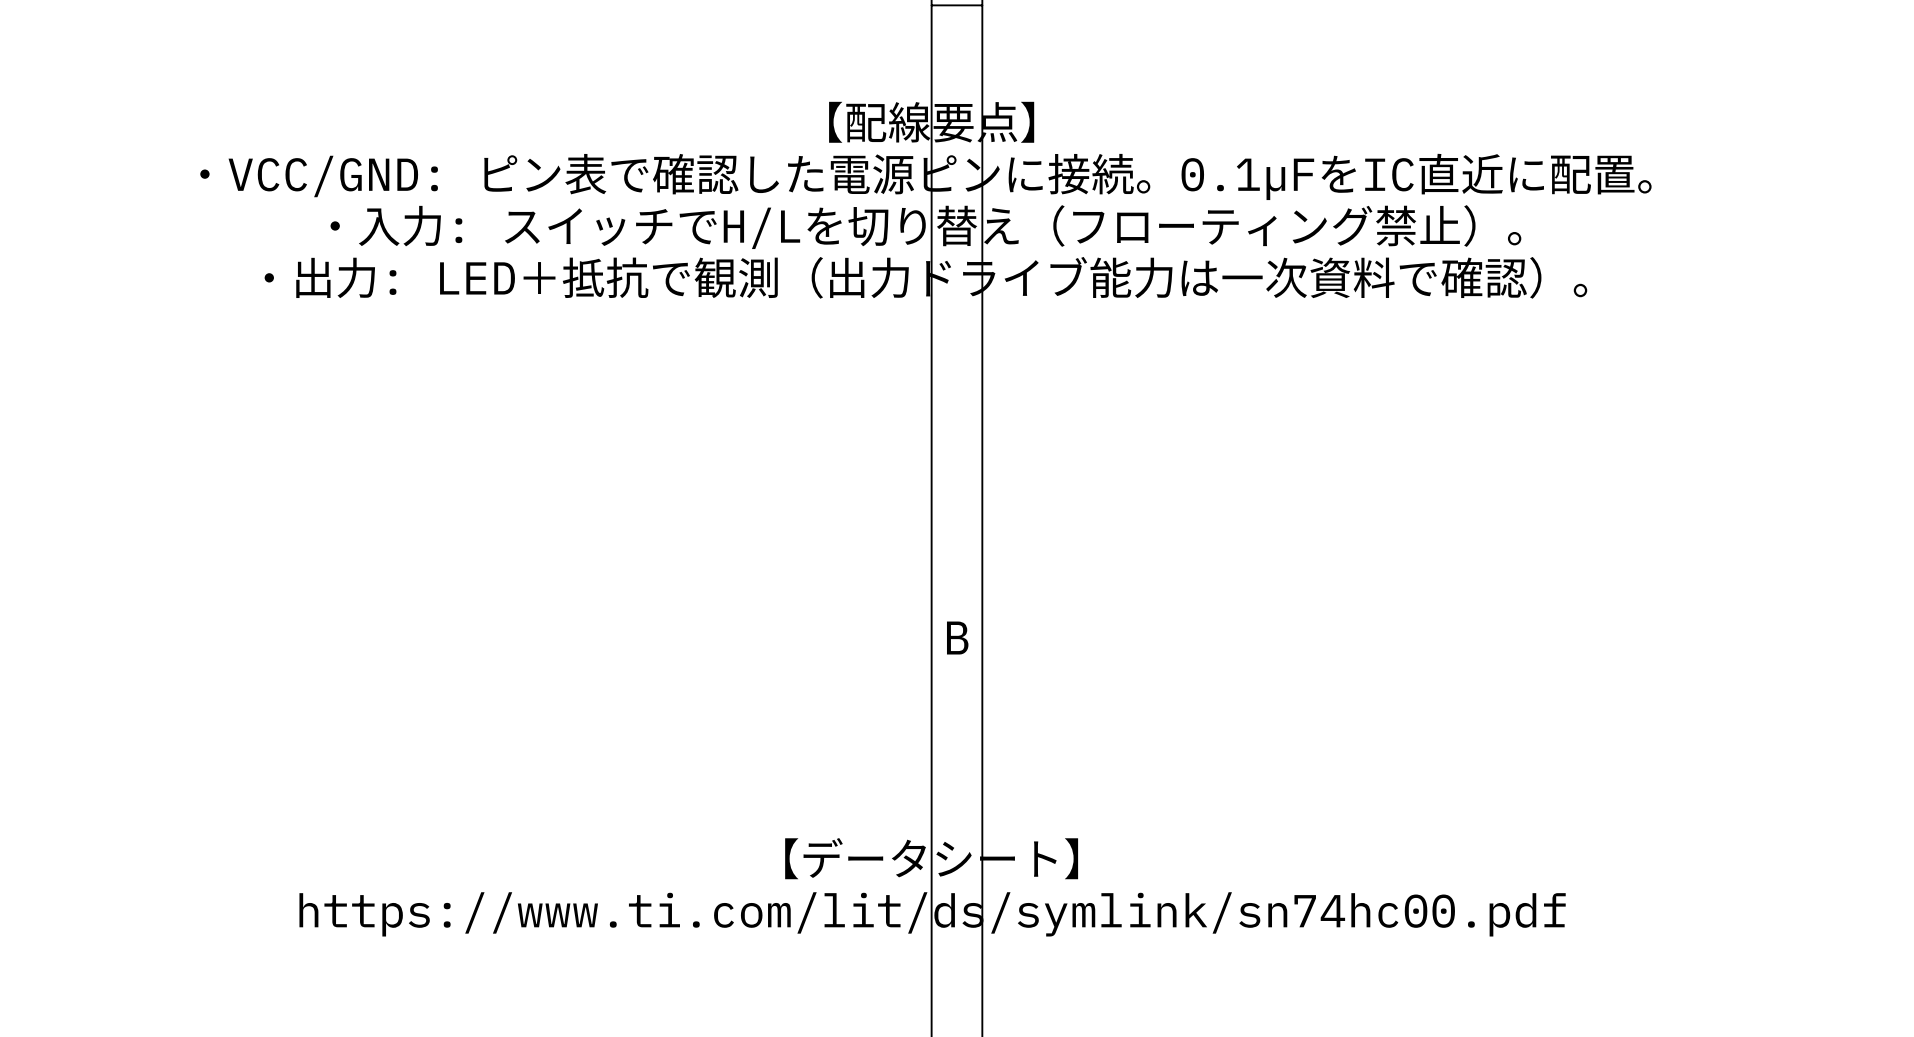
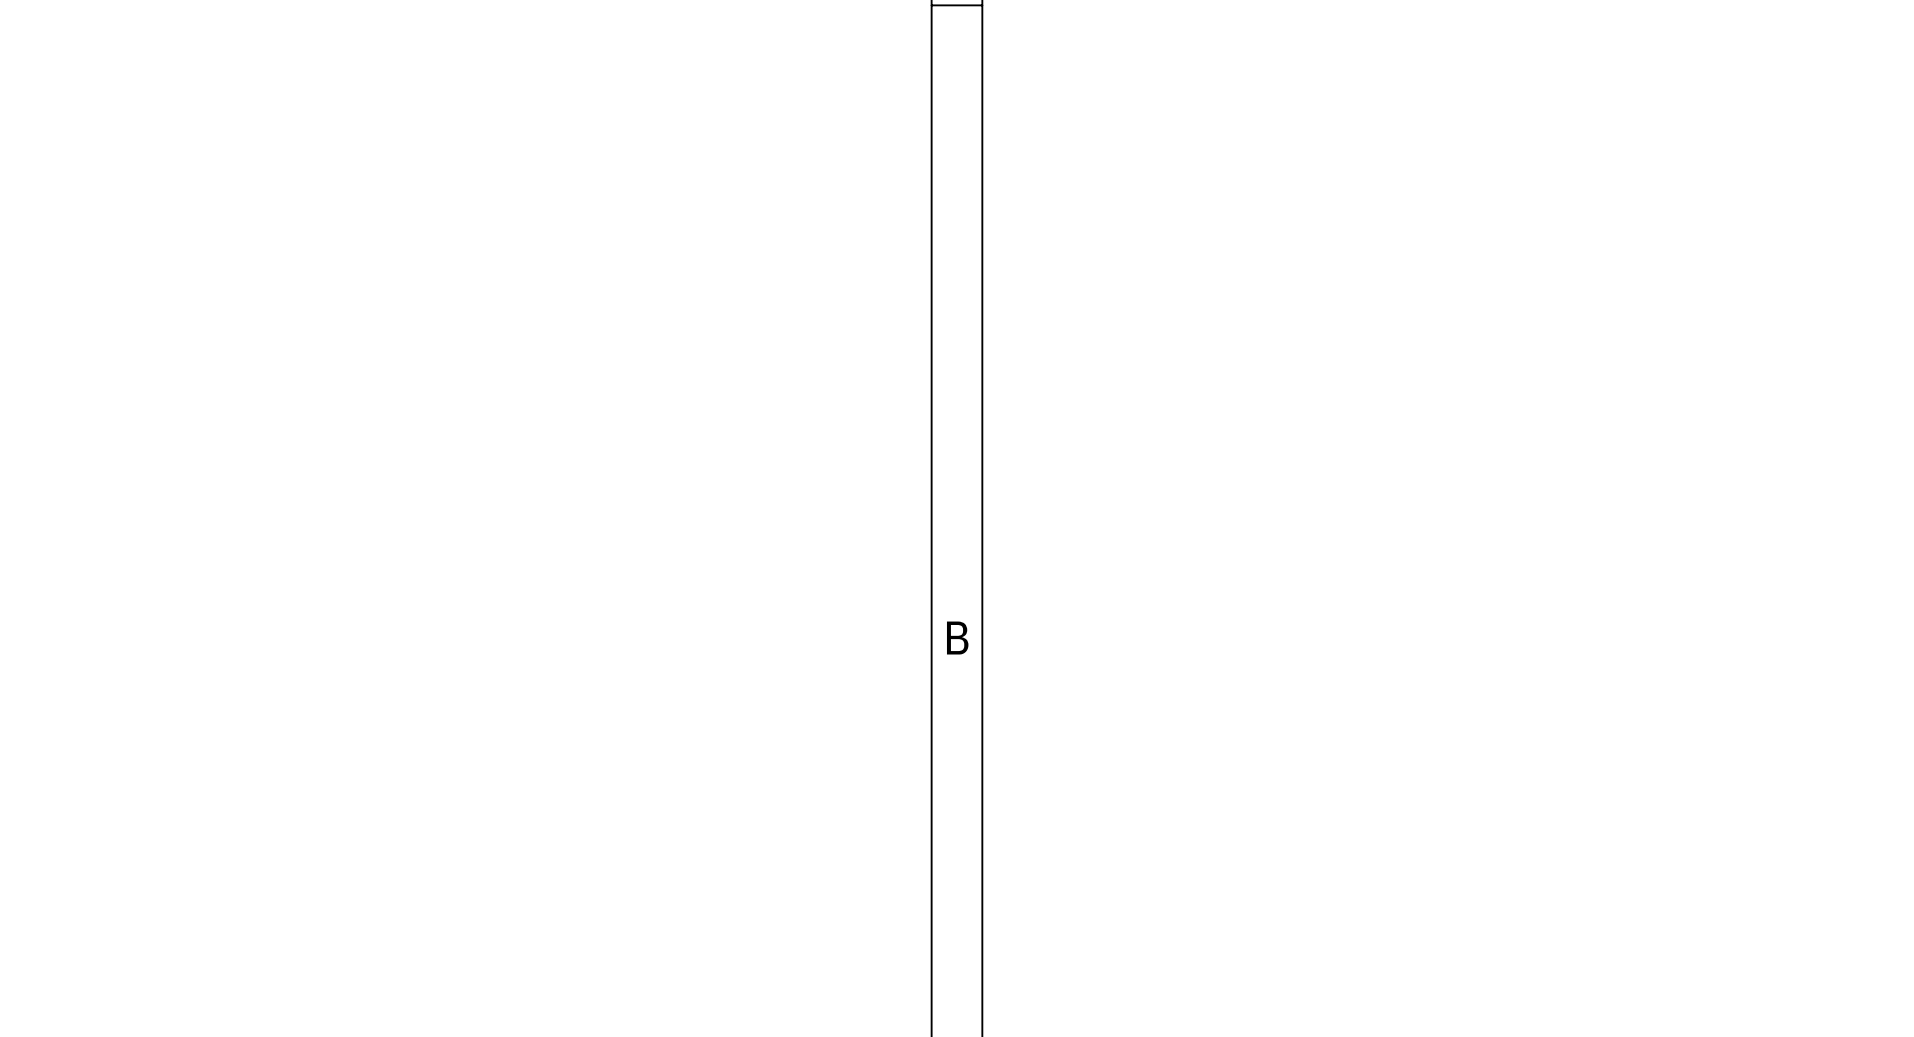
text: 【配線要点】 (931, 122) -> none
text: ・VCC/GND: ピン表で確認した電源ピンに接続。0.1µFをIC直近に配置。 (925, 176) -> none
text: ・入力: スイッチでH/Lを切り替え（フローティング禁止）。 (925, 227) -> none
text: ・出力: LED＋抵抗で観測（出力ドライブ能力は一次資料で確認）。 (925, 277) -> none
text: 【データシート】 (931, 858) -> none
text: https://www.ti.com/lit/ds/symlink/sn74hc00.pdf (932, 914) -> none

